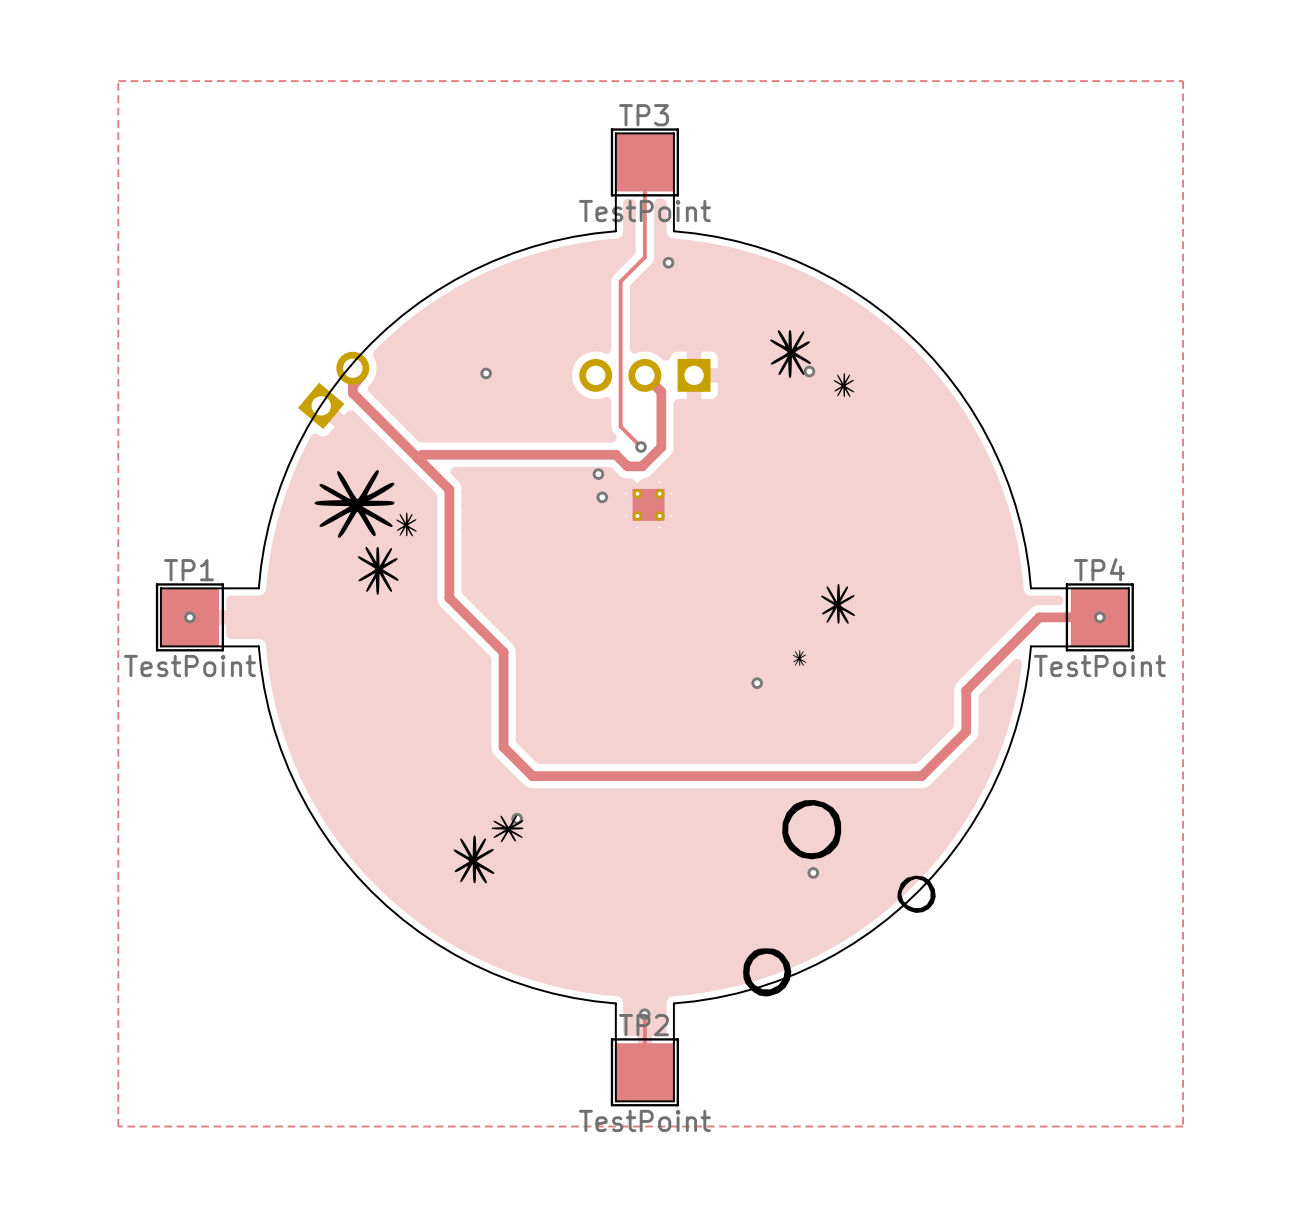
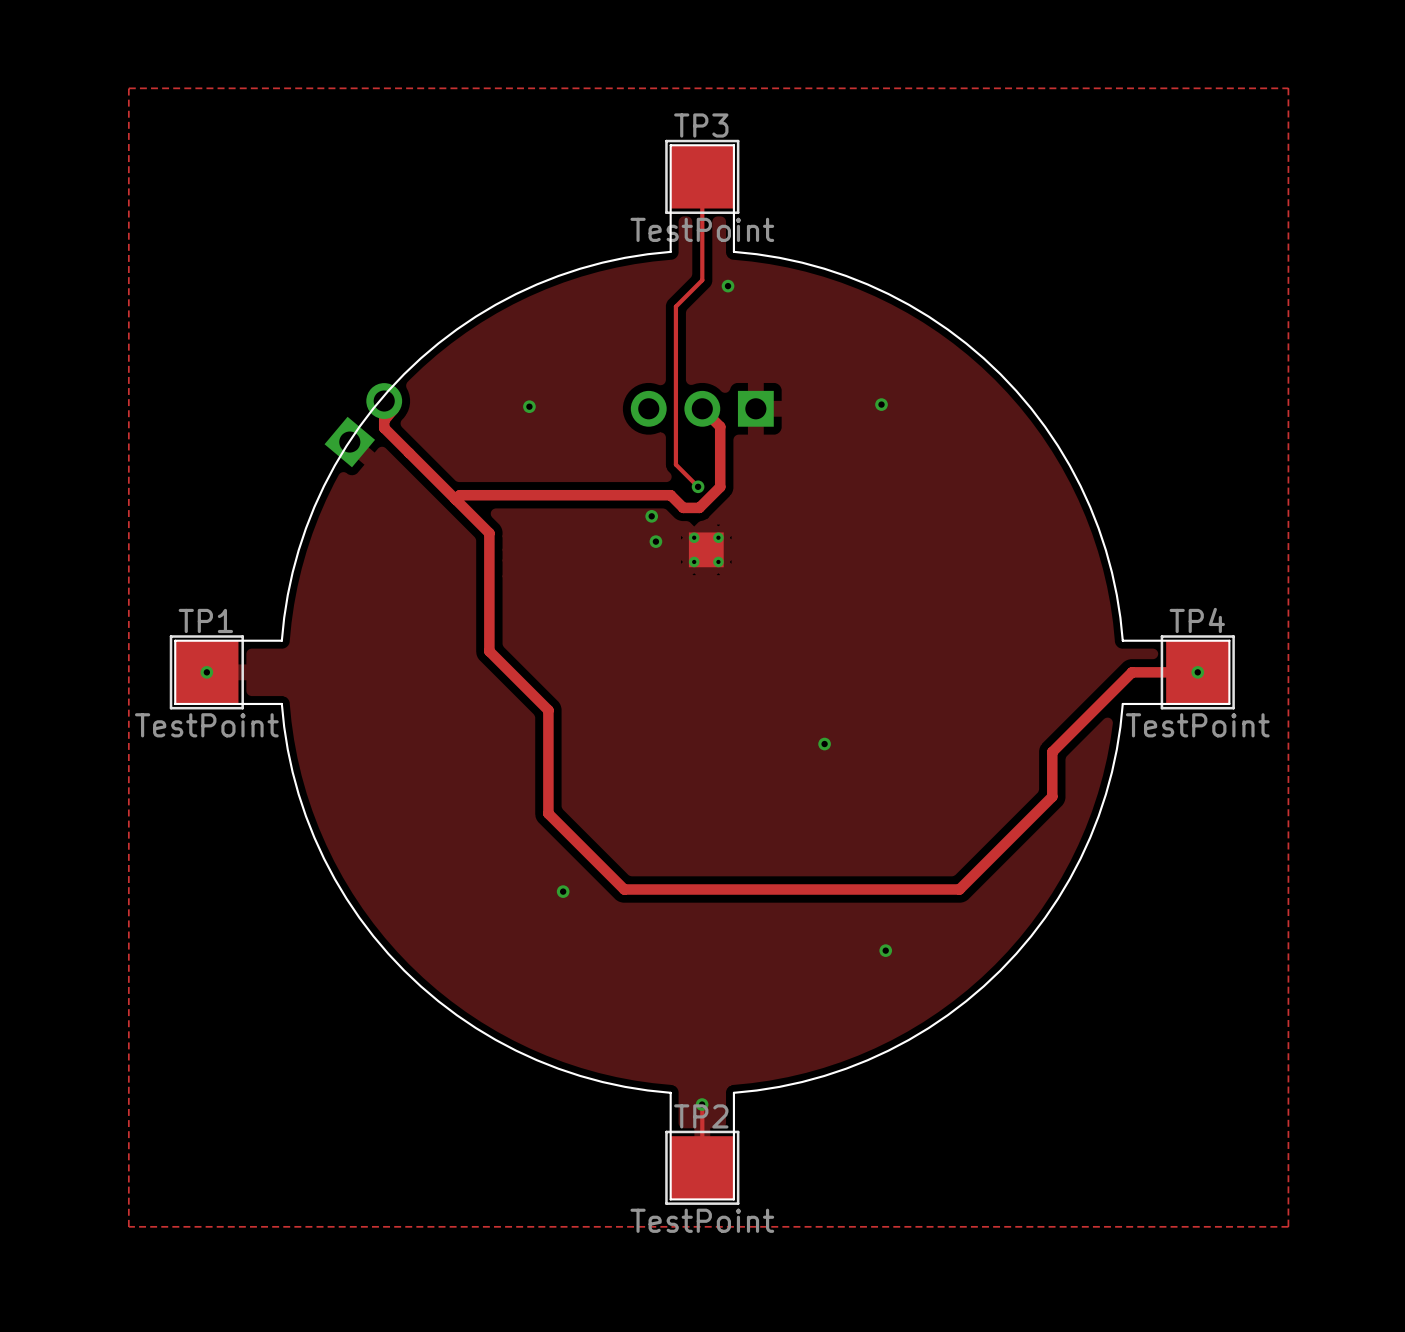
drawing: [770, 330, 855, 398] -> none
drawing: [314, 470, 417, 595] -> none
drawing: [821, 583, 855, 624] -> none
drawing: [792, 650, 807, 667] -> none
track: (532, 776) (921, 776) -> (580, 845) (624, 889) (959, 889) (1003, 845)
drawing: [743, 800, 936, 997] -> none
drawing: [453, 815, 524, 884] -> none

